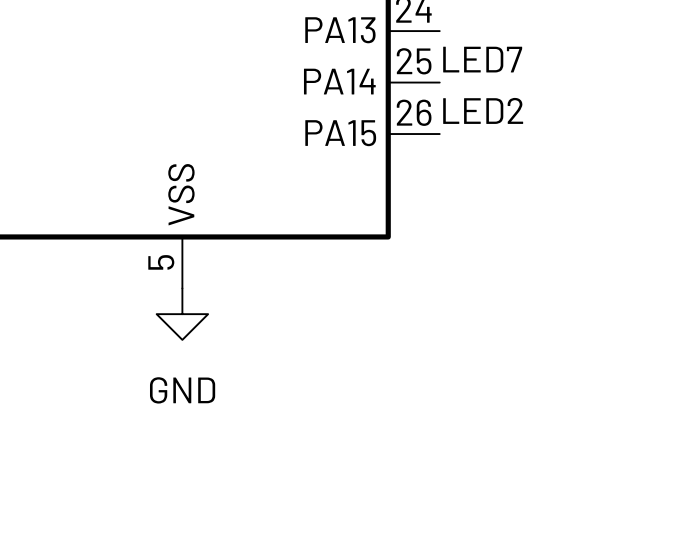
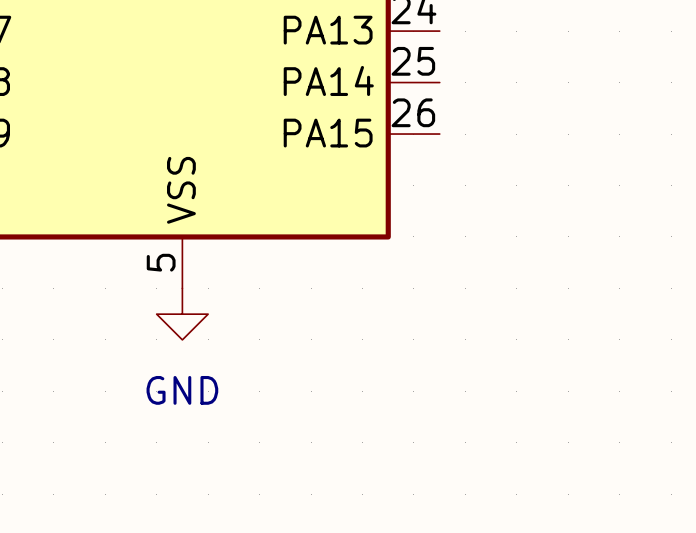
label: LED7 (482, 59) -> none
label: LED2 (483, 110) -> none

